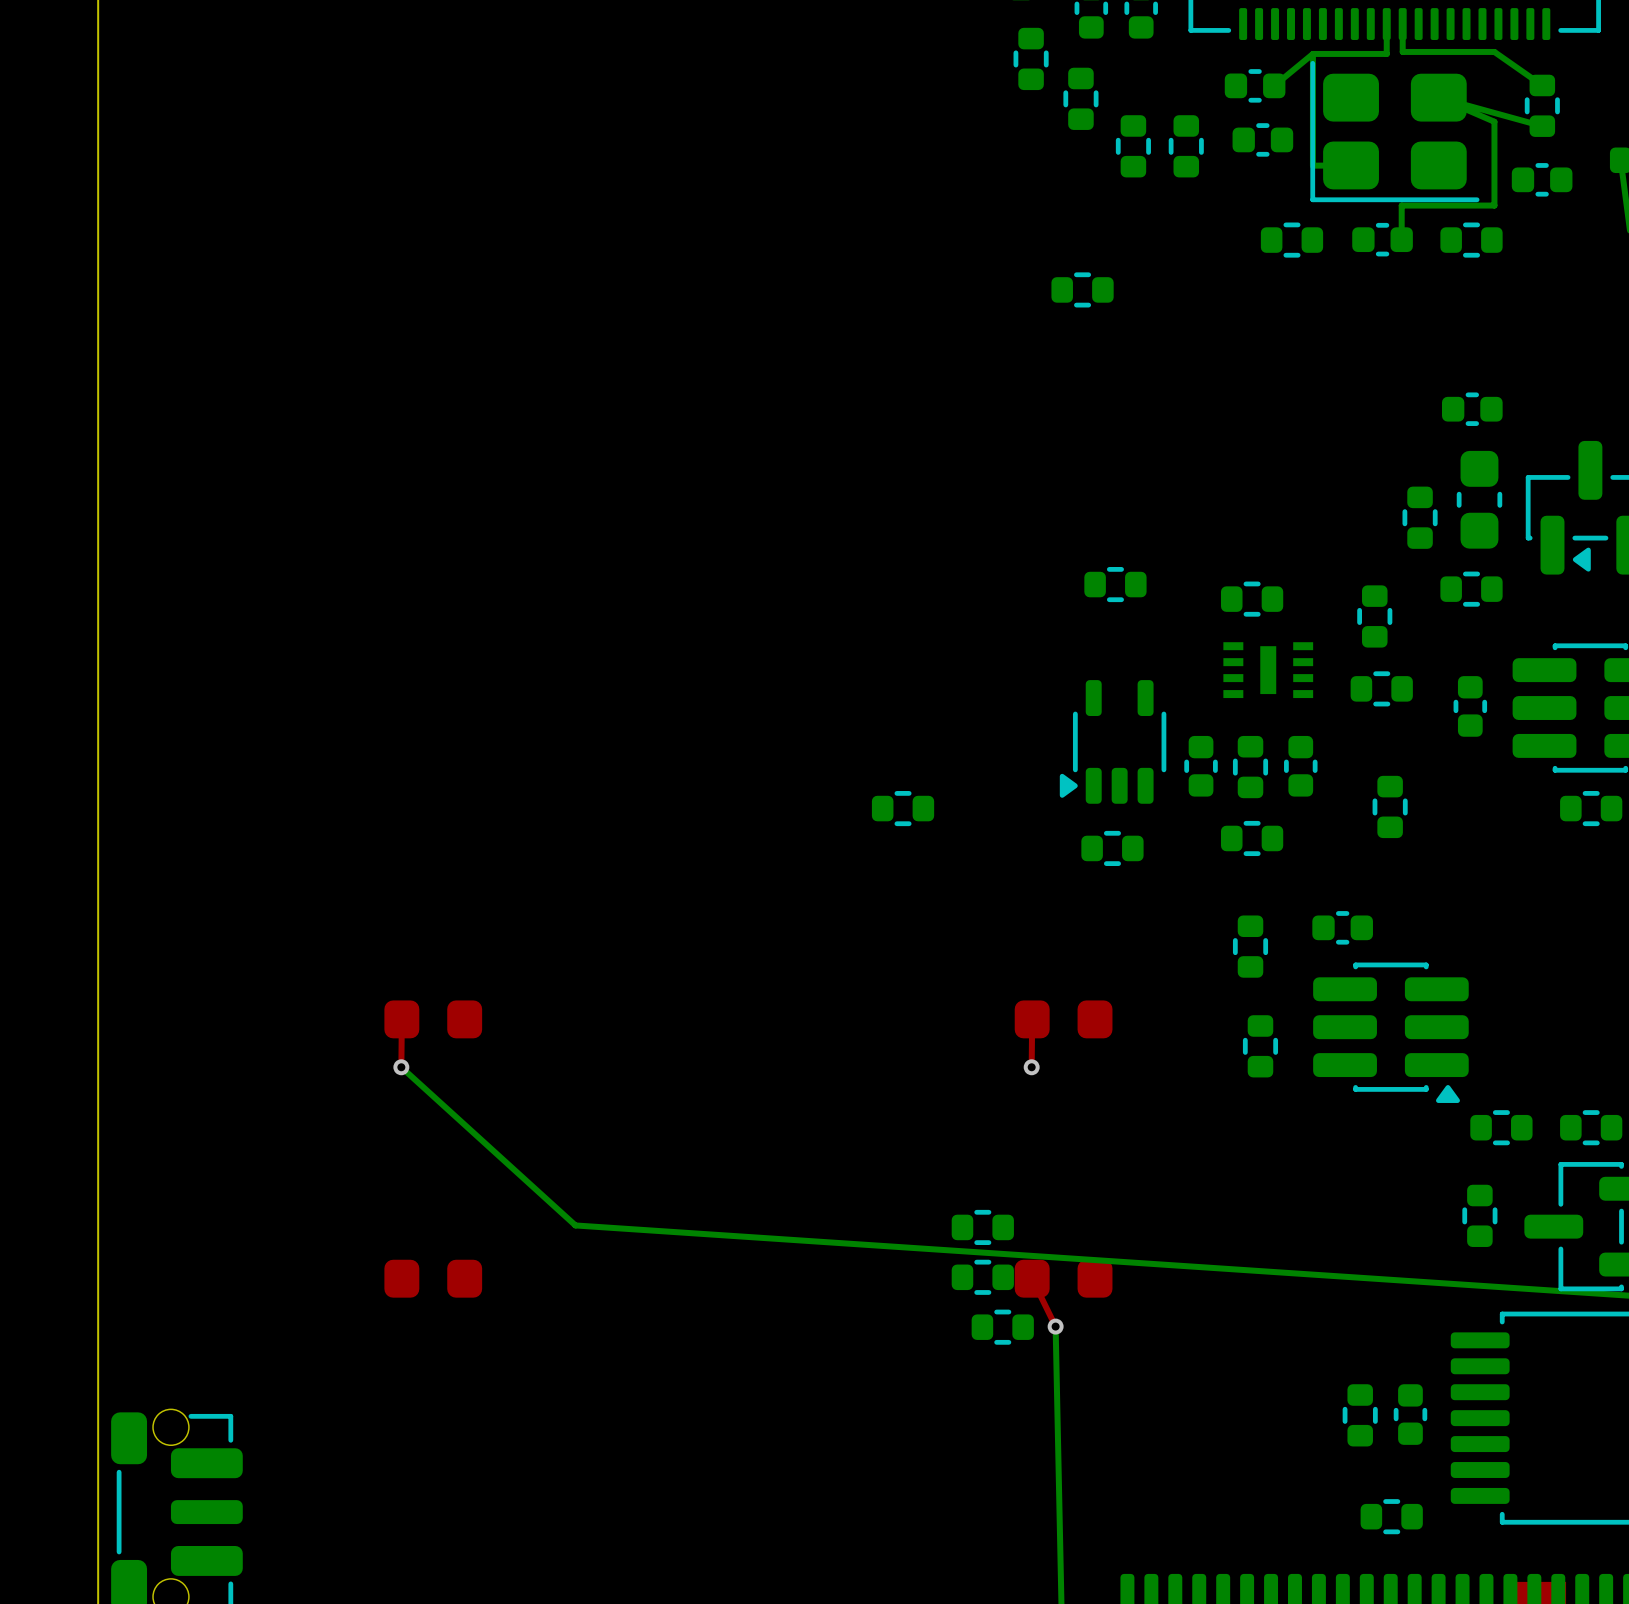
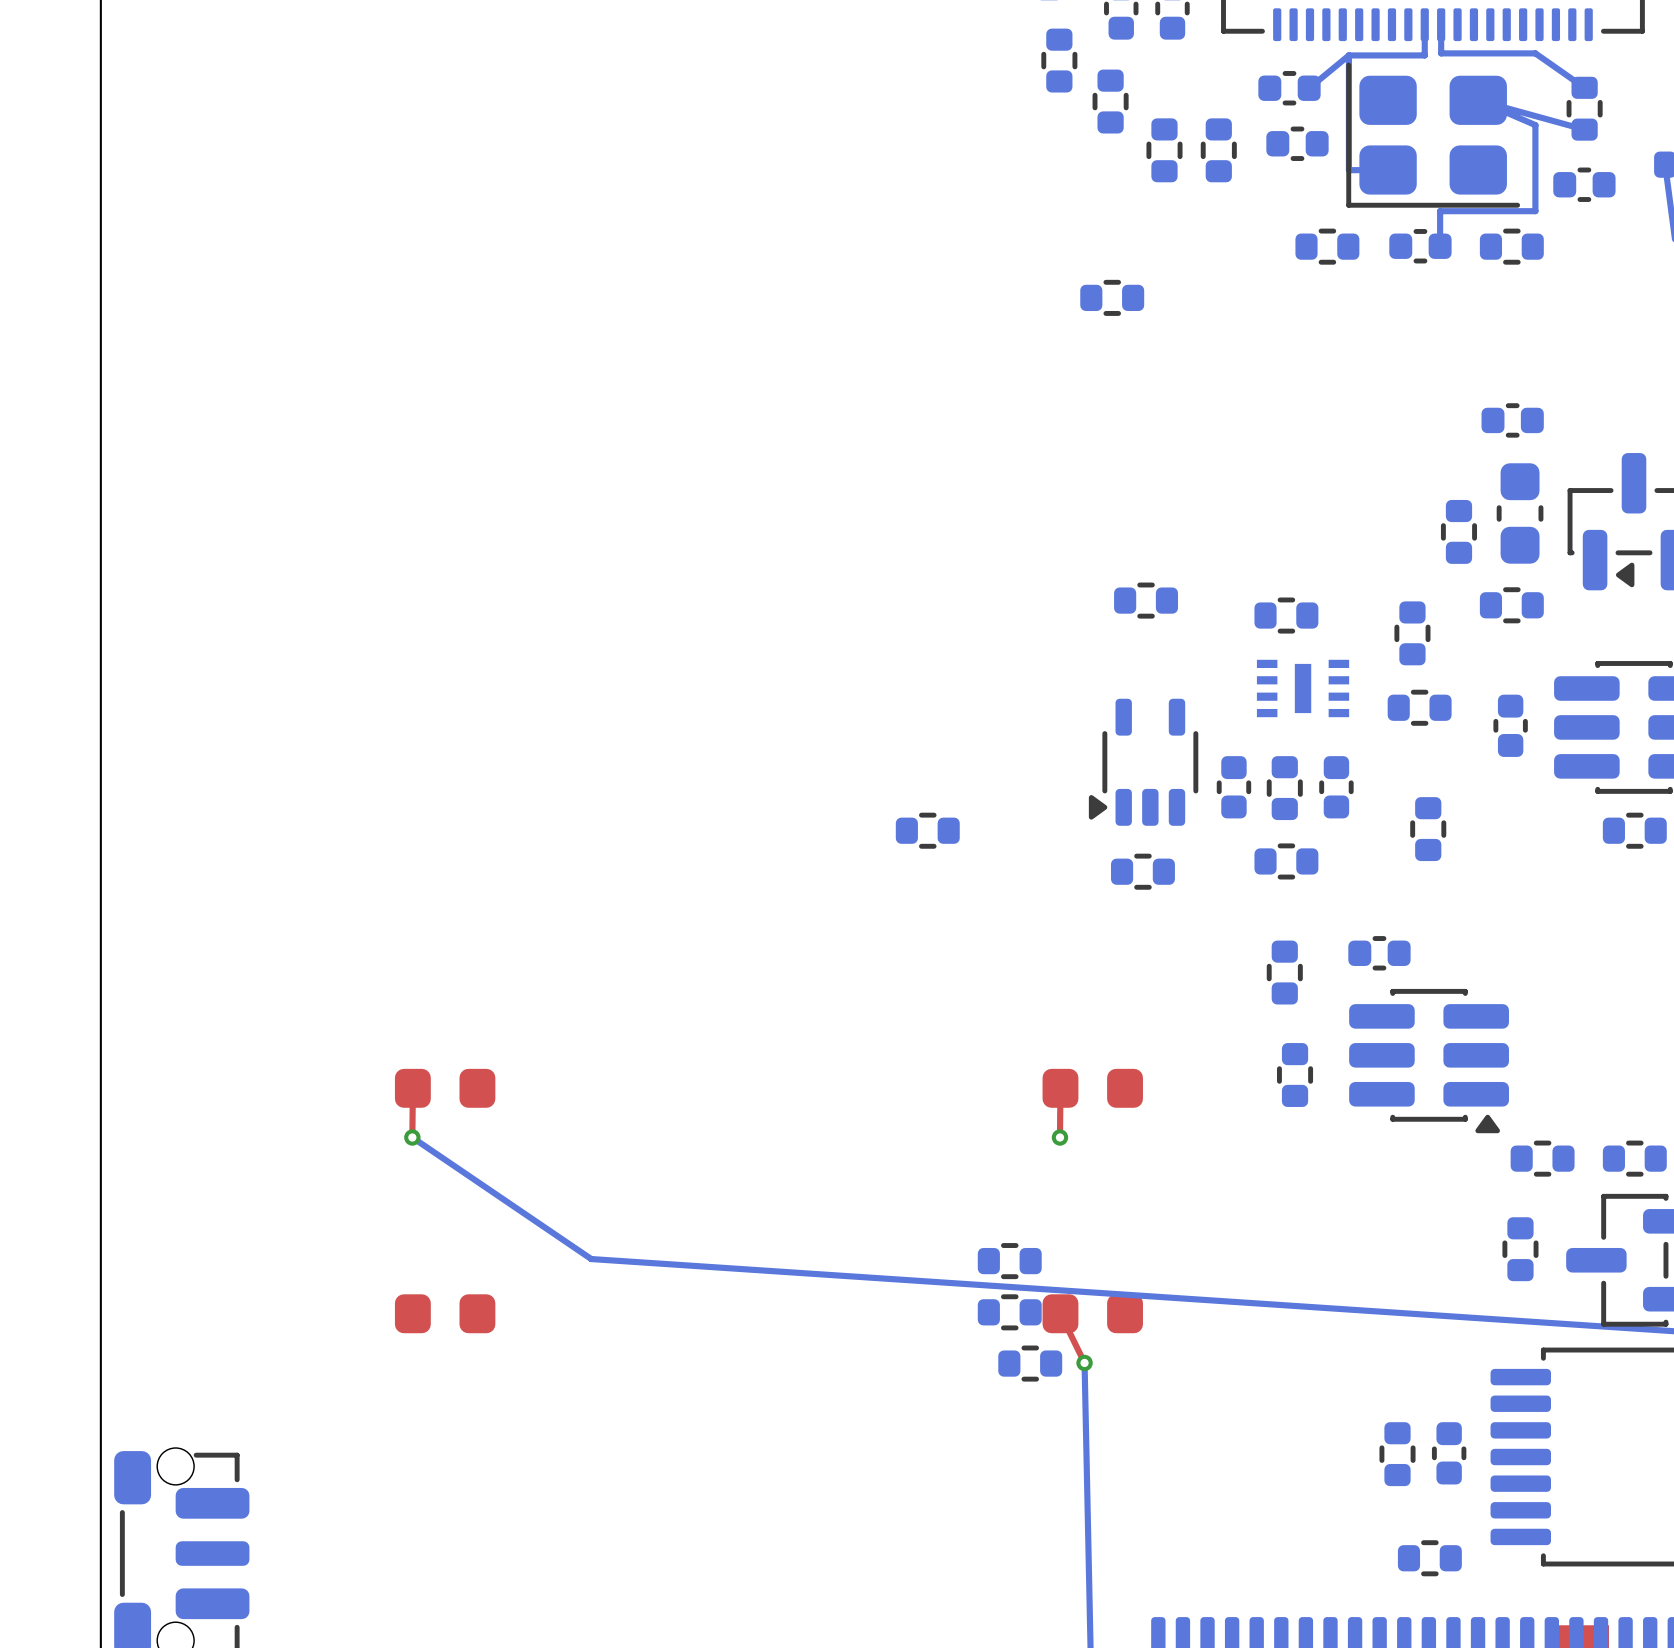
top track: (401, 1019) (401, 1067) -> (412, 1088) (412, 1137)
part position: (433, 1019) -> (445, 1088)
top track: (1032, 1019) (1031, 1067) -> (1060, 1088) (1059, 1137)
part position: (1063, 1019) -> (1092, 1088)
bottom track: (401, 1067) (575, 1225) -> (412, 1137) (591, 1259)
via position: (401, 1067) -> (412, 1137)
via position: (1031, 1067) -> (1059, 1137)

